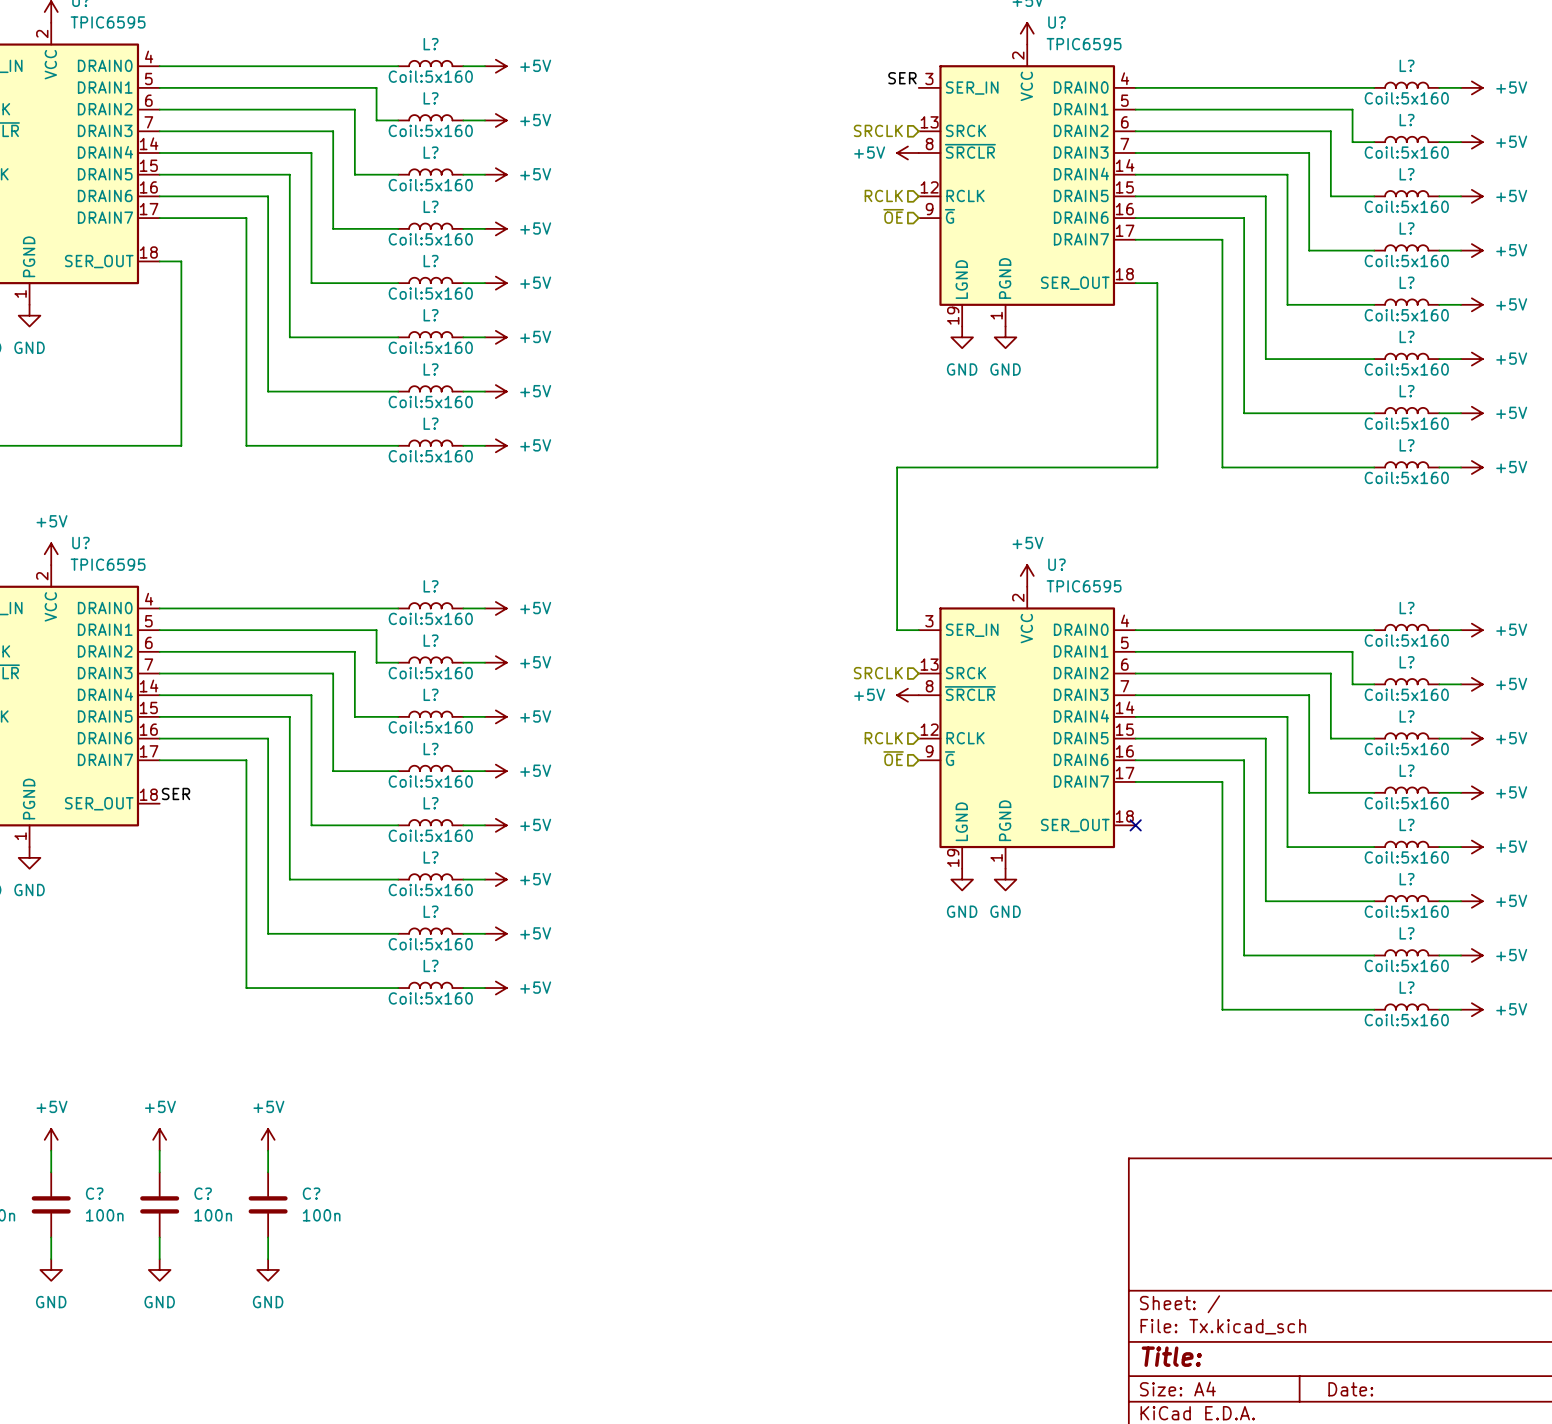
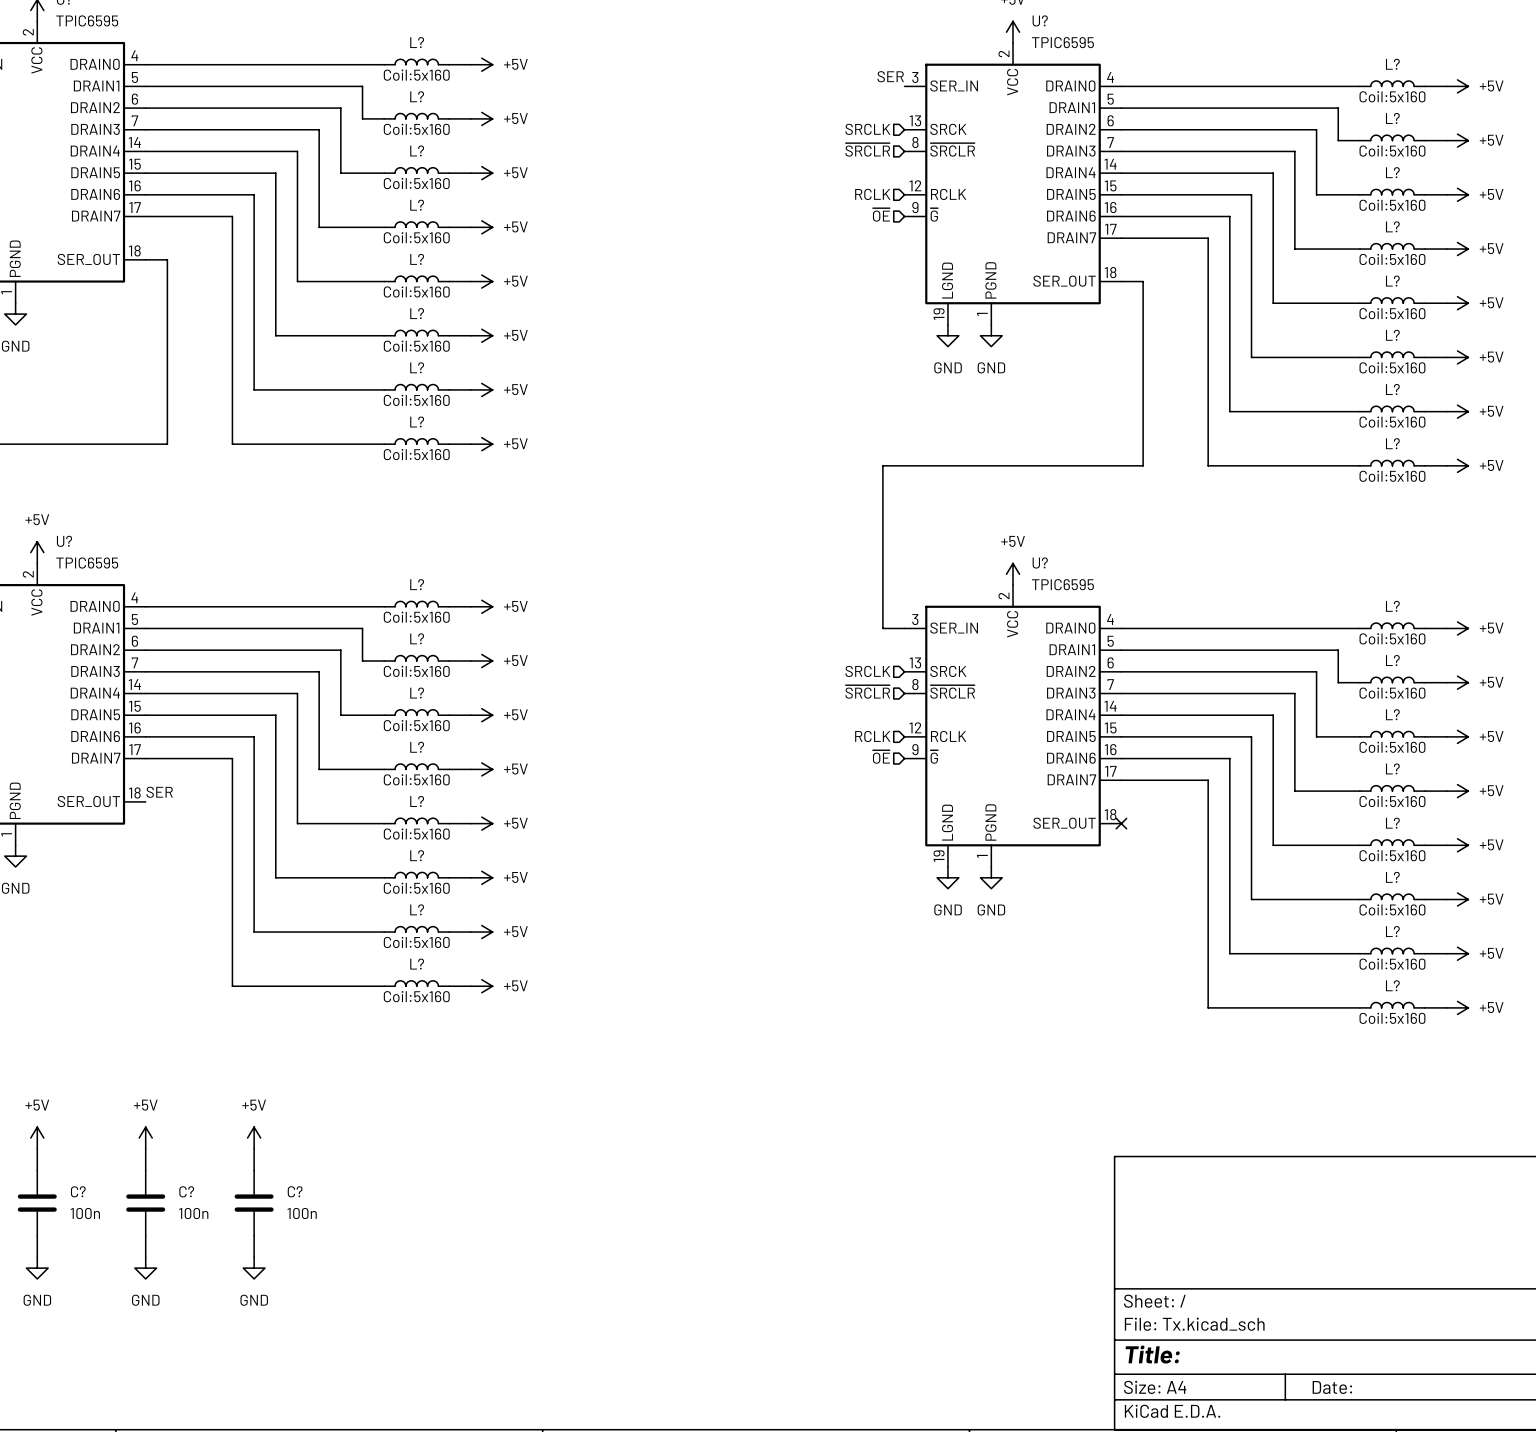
hierarchical label: none -> ~{SRCLR} (867, 149)
power symbol: +5V (907, 152) -> none
hierarchical label: none -> ~{SRCLR} (867, 691)
power symbol: +5V (907, 695) -> none

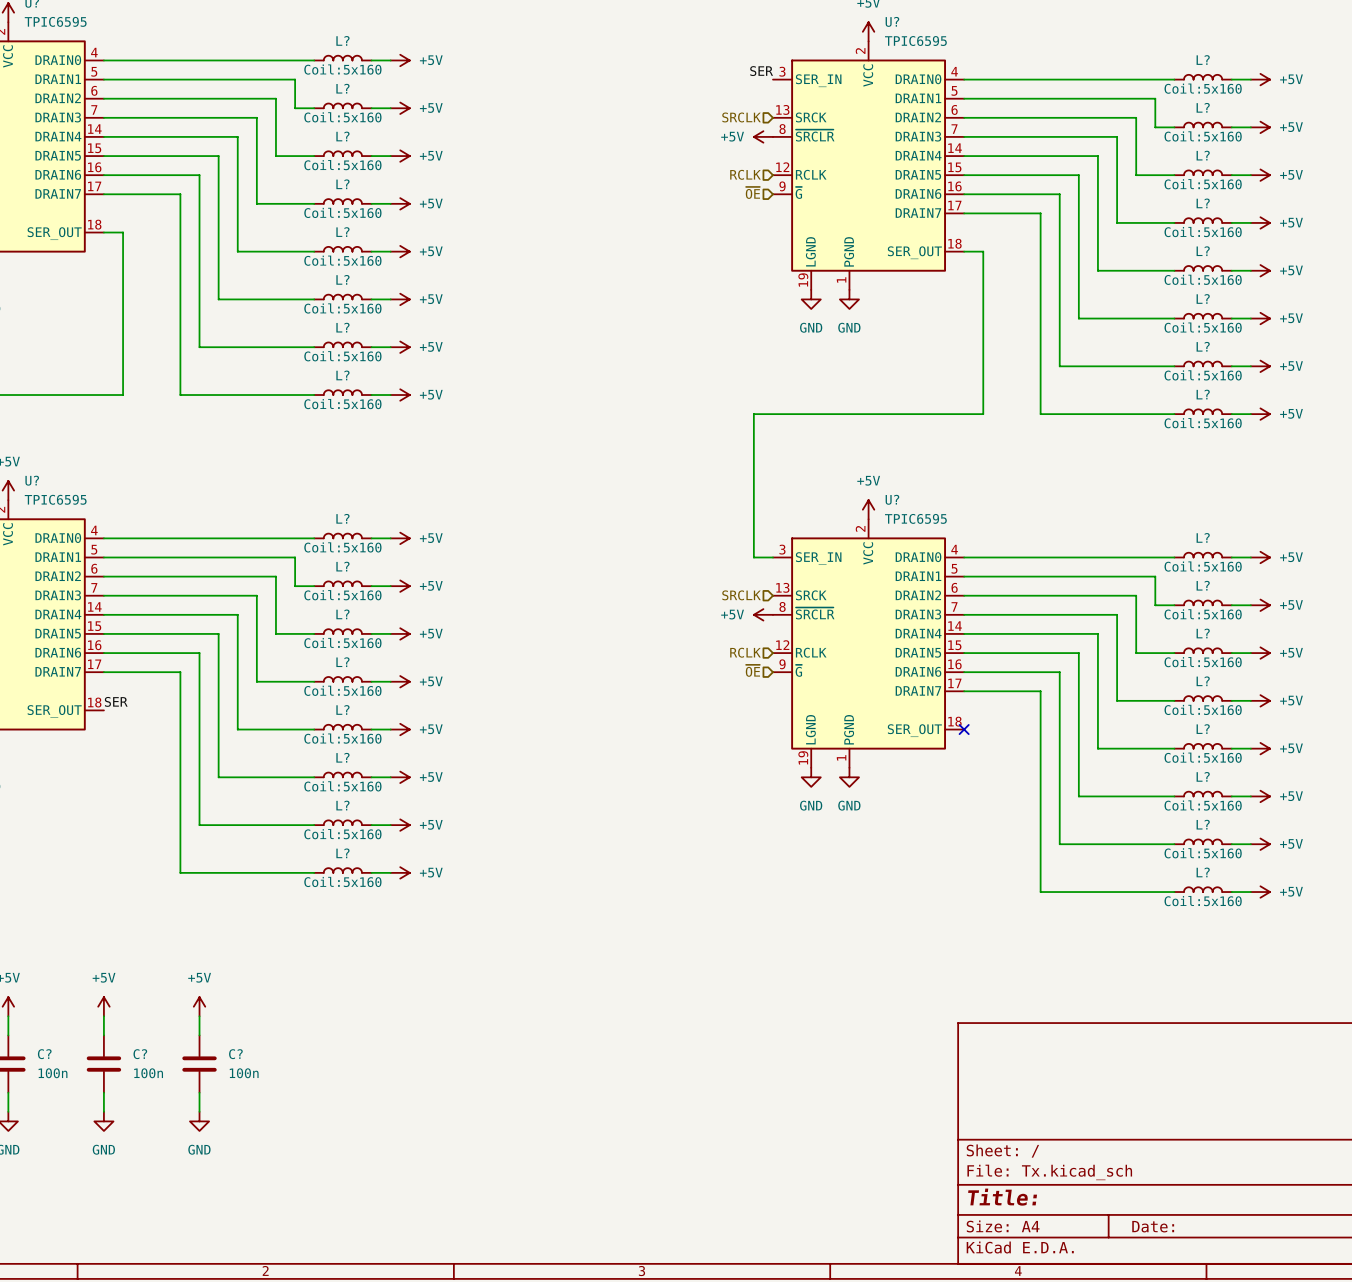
hierarchical label: ~{SRCLR} (867, 149) -> none
power symbol: none -> +5V (763, 136)
hierarchical label: ~{SRCLR} (867, 691) -> none
power symbol: none -> +5V (763, 614)

